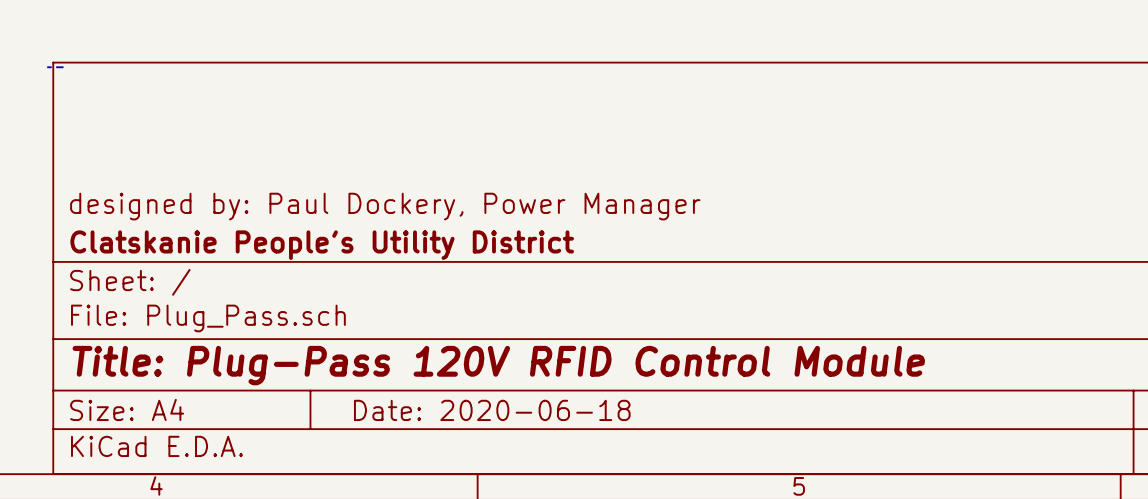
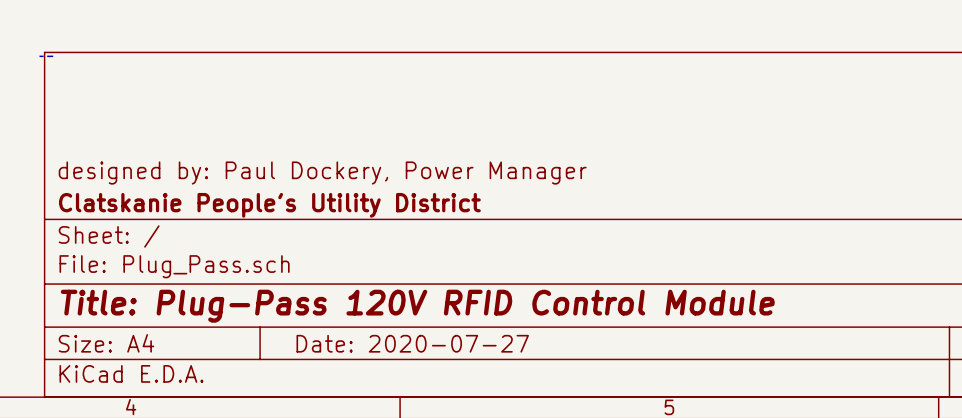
title block: Date: 2020-06-18 (492, 410) -> Date: 2020-07-27 (412, 343)

